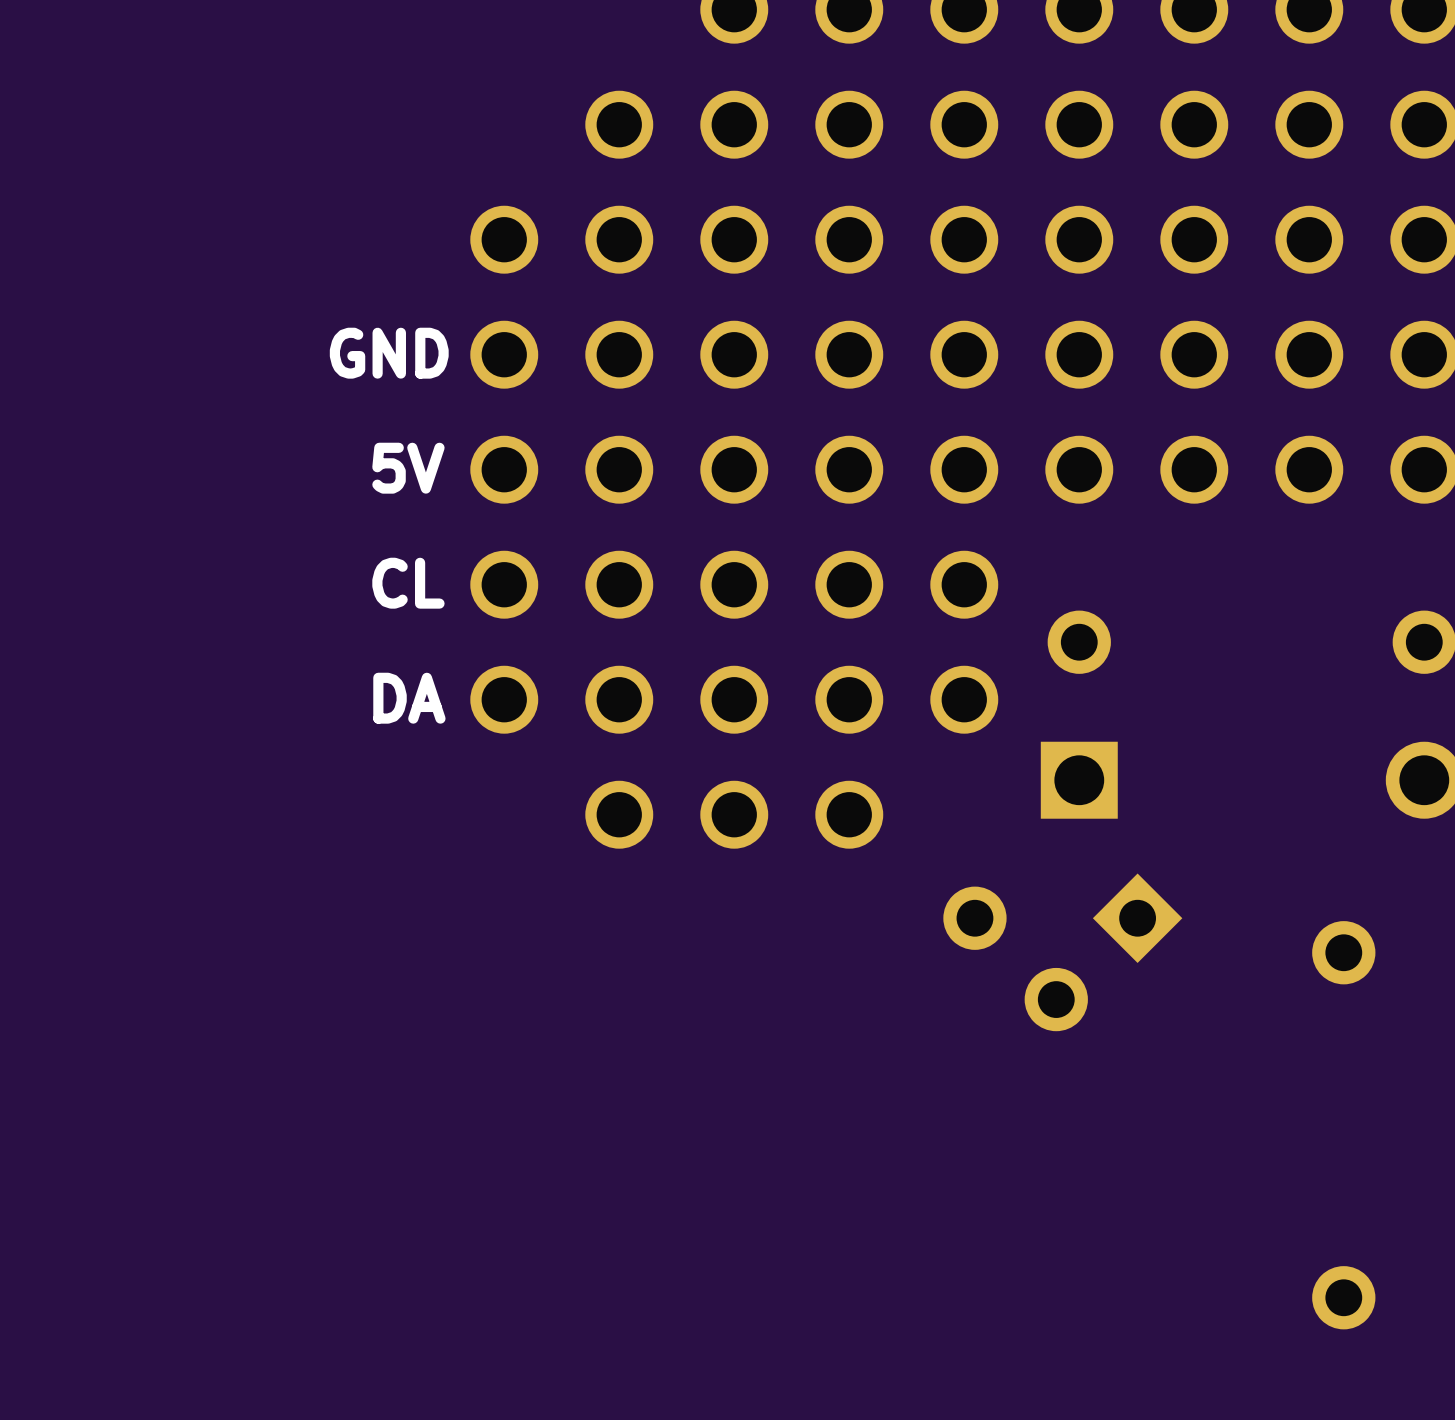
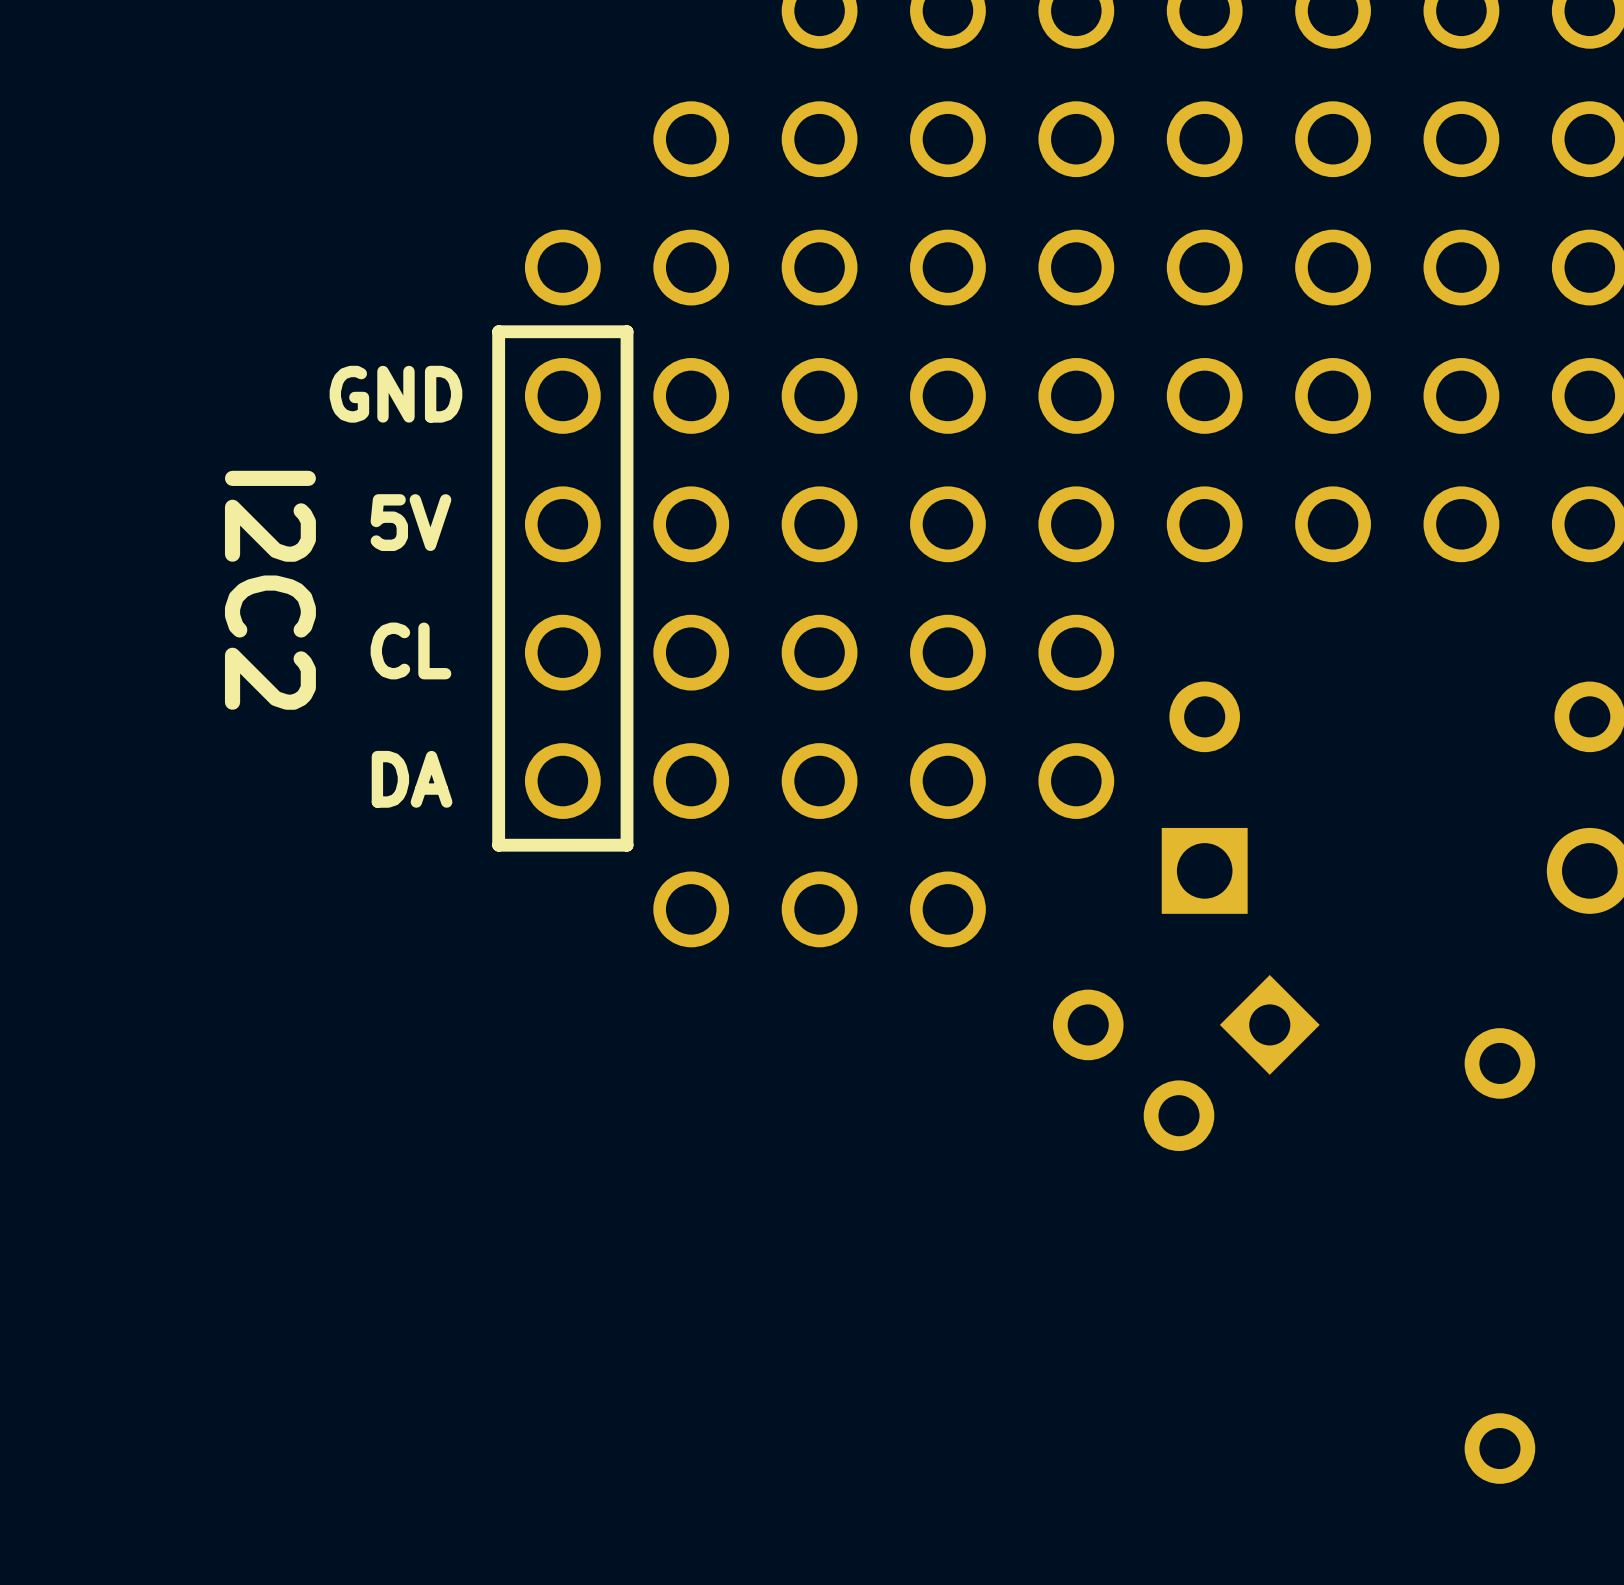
line: none -> (627, 331) (627, 845) (498, 845) (498, 331) (627, 331)
text position: GND (389, 353) -> GND (395, 394)
text position: 5V (408, 468) -> 5V (410, 522)
text: none -> I2C2 (270, 590)
text position: CL (408, 583) -> CL (410, 650)
text position: DA (409, 698) -> DA (412, 779)

